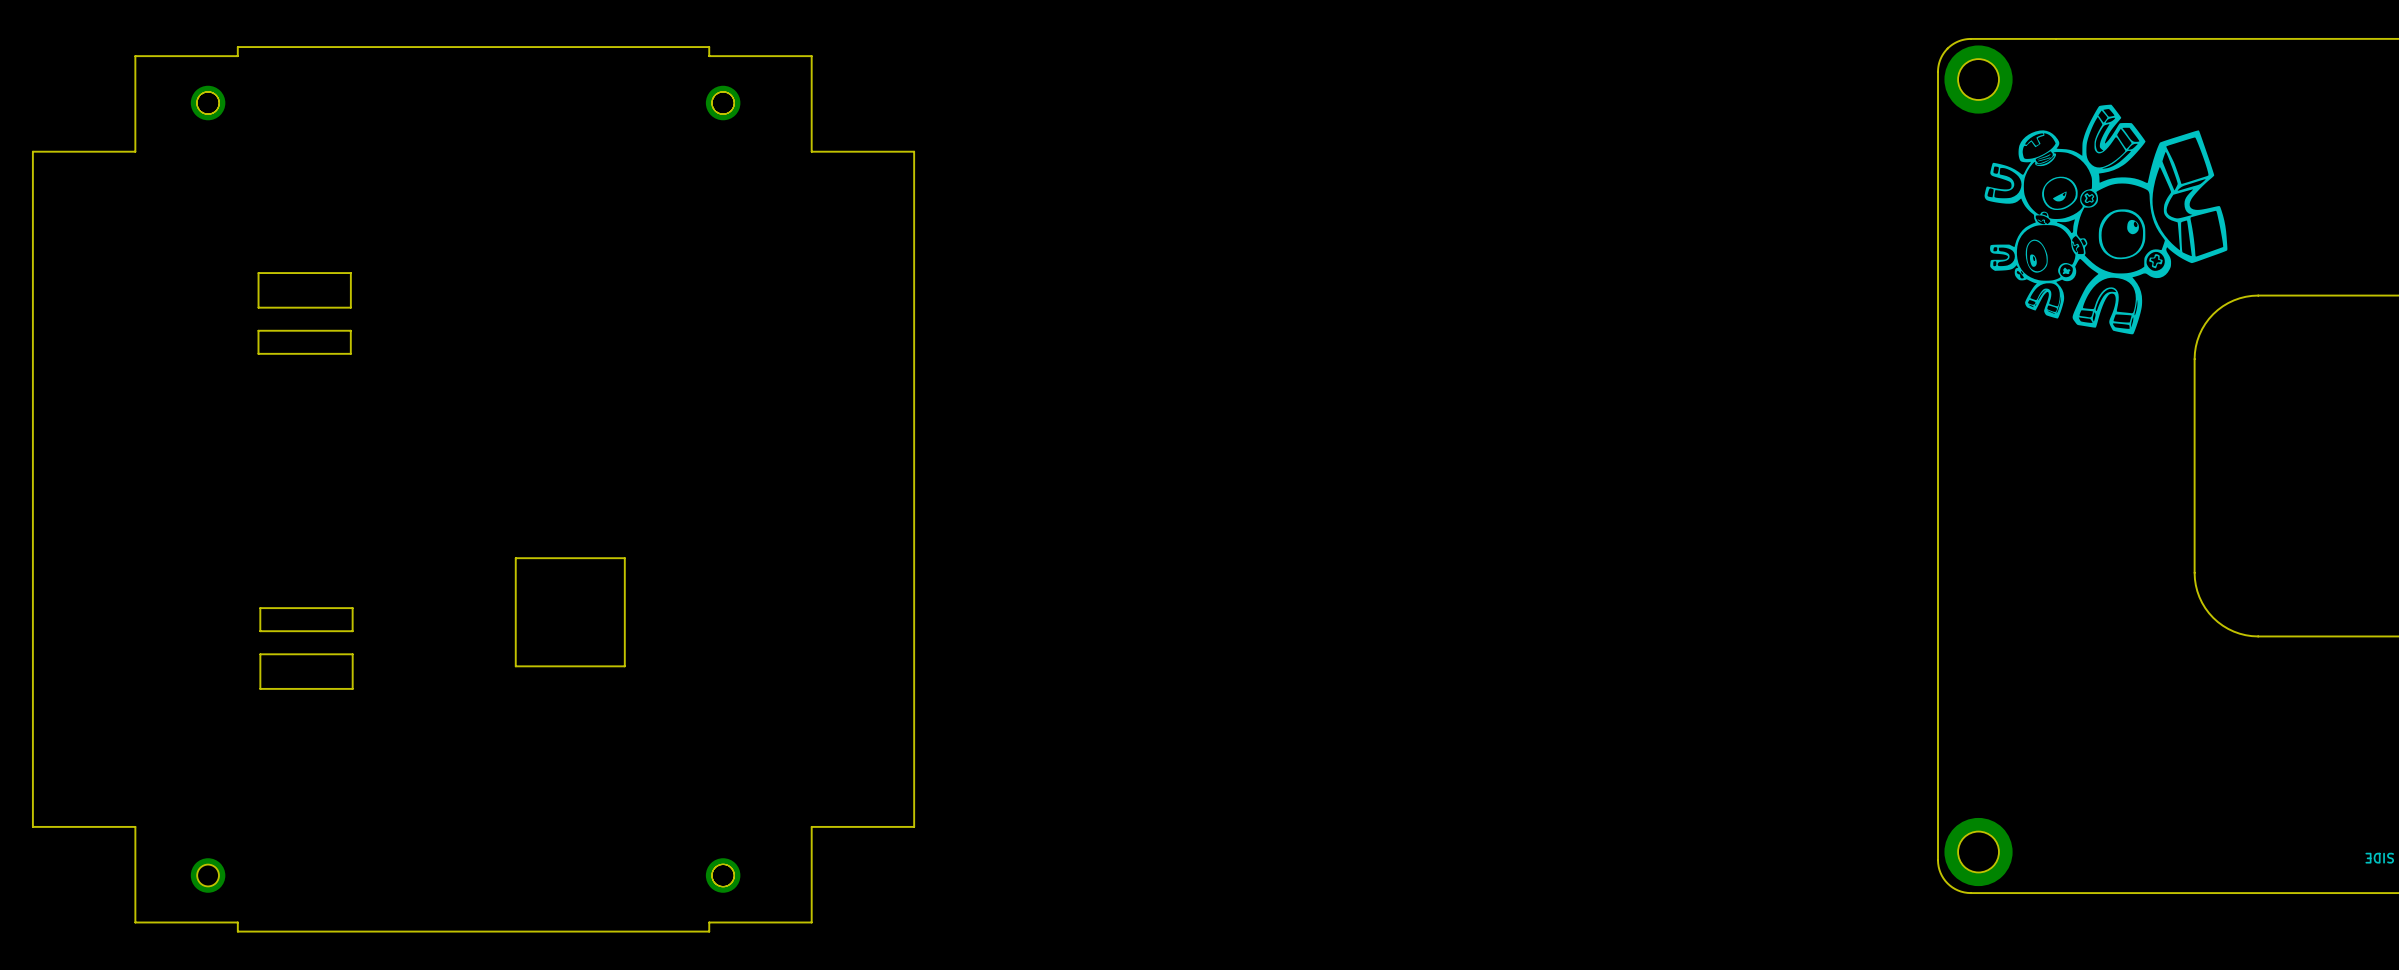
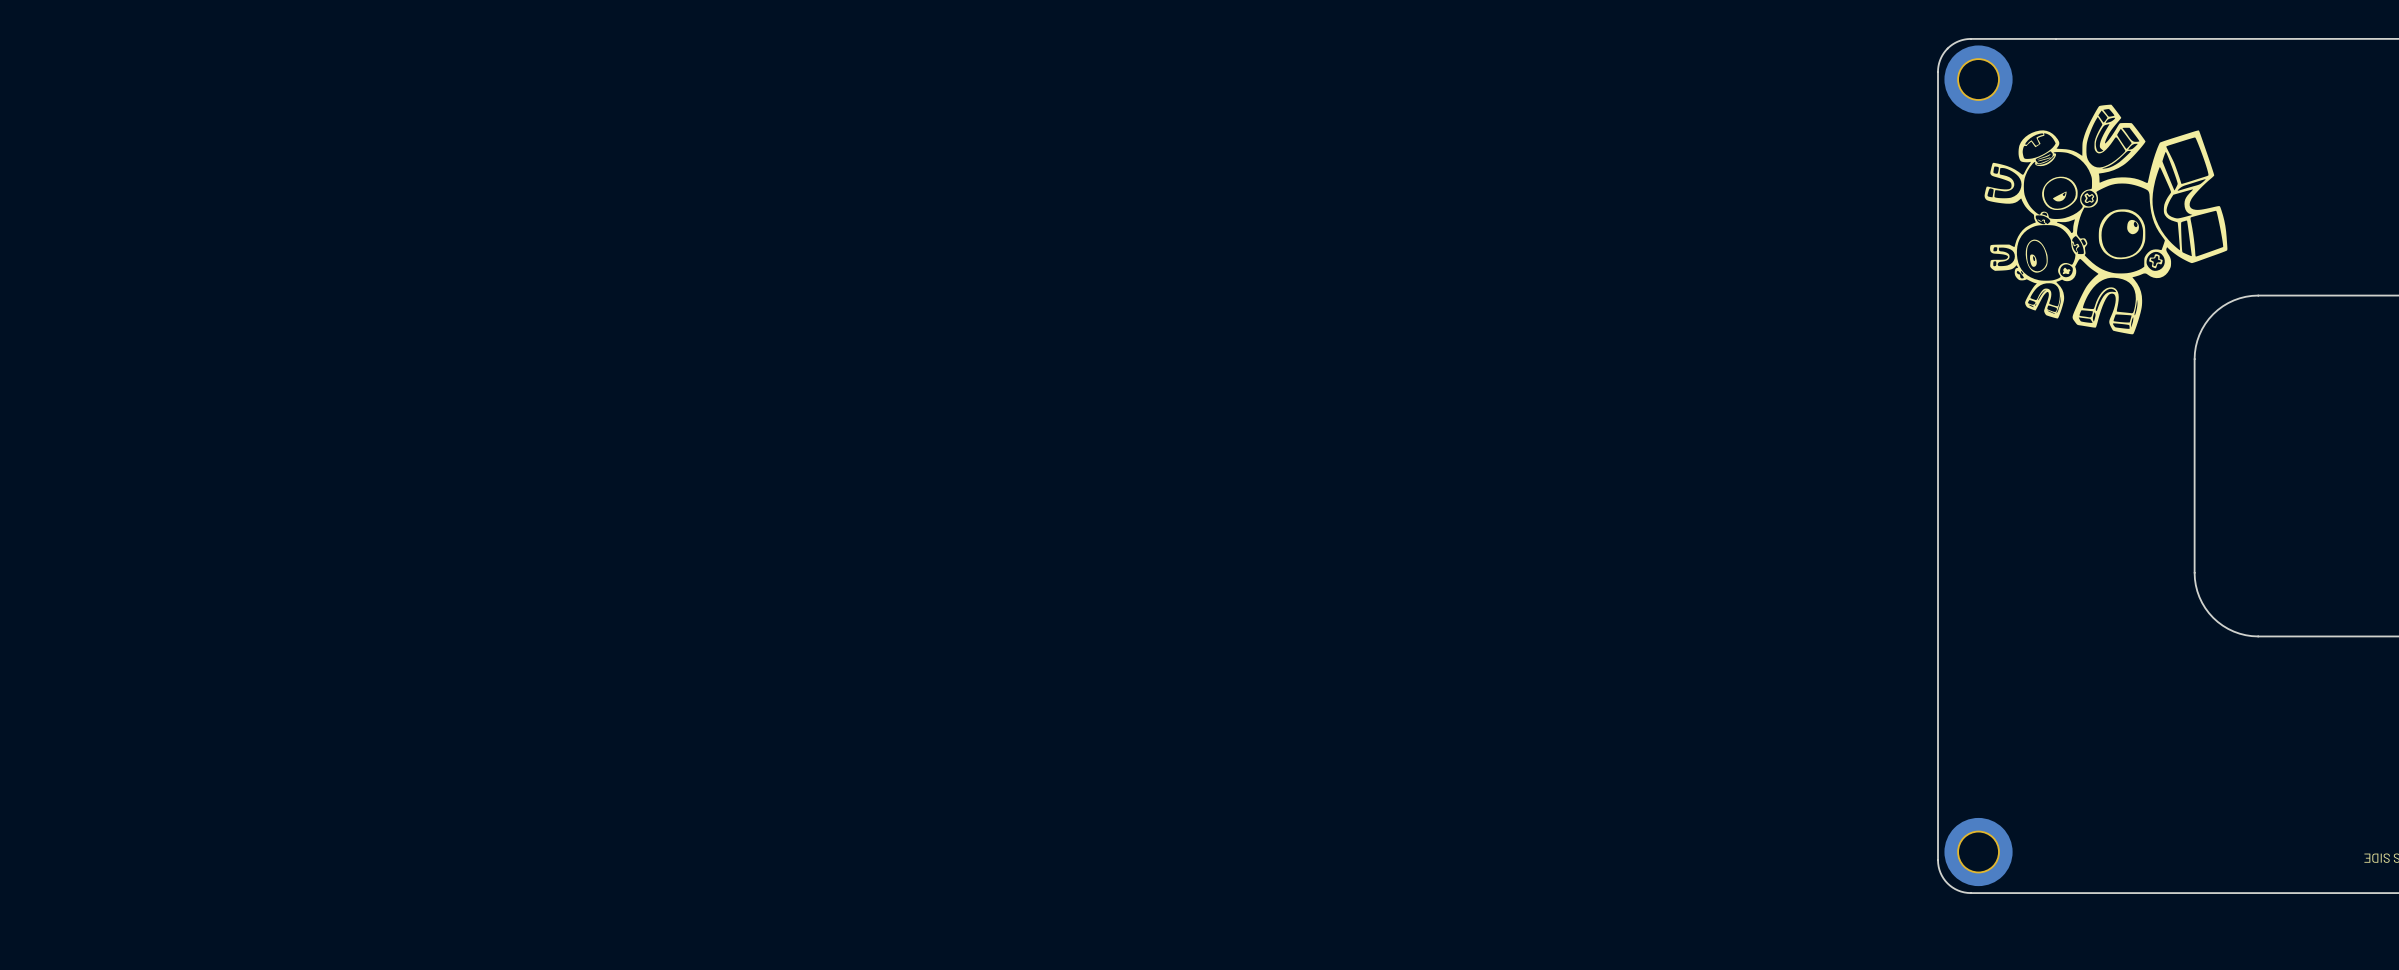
board edge: (709, 47) (709, 56) (811, 56) (811, 151) (914, 151) (914, 826) (811, 826) (811, 922) (709, 922) (709, 931) (237, 931) (237, 922) (135, 922) (135, 826) (32, 826) (32, 151) (135, 151) (135, 56) (237, 56) (237, 47) (709, 47) -> none
part: (208, 103) -> none
part: (208, 103) -> none
part: (723, 103) -> none
part: (723, 103) -> none
board edge: (350, 273) (350, 307) (258, 307) (258, 273) (350, 273) -> none
board edge: (350, 330) (350, 353) (258, 353) (258, 330) (350, 330) -> none
board edge: (624, 558) (515, 558) (515, 666) (624, 666) (624, 558) -> none
board edge: (352, 608) (352, 631) (260, 631) (260, 608) (352, 608) -> none
board edge: (352, 654) (352, 688) (260, 688) (260, 654) (352, 654) -> none
part: (208, 875) -> none
part: (723, 875) -> none
part: (723, 875) -> none

